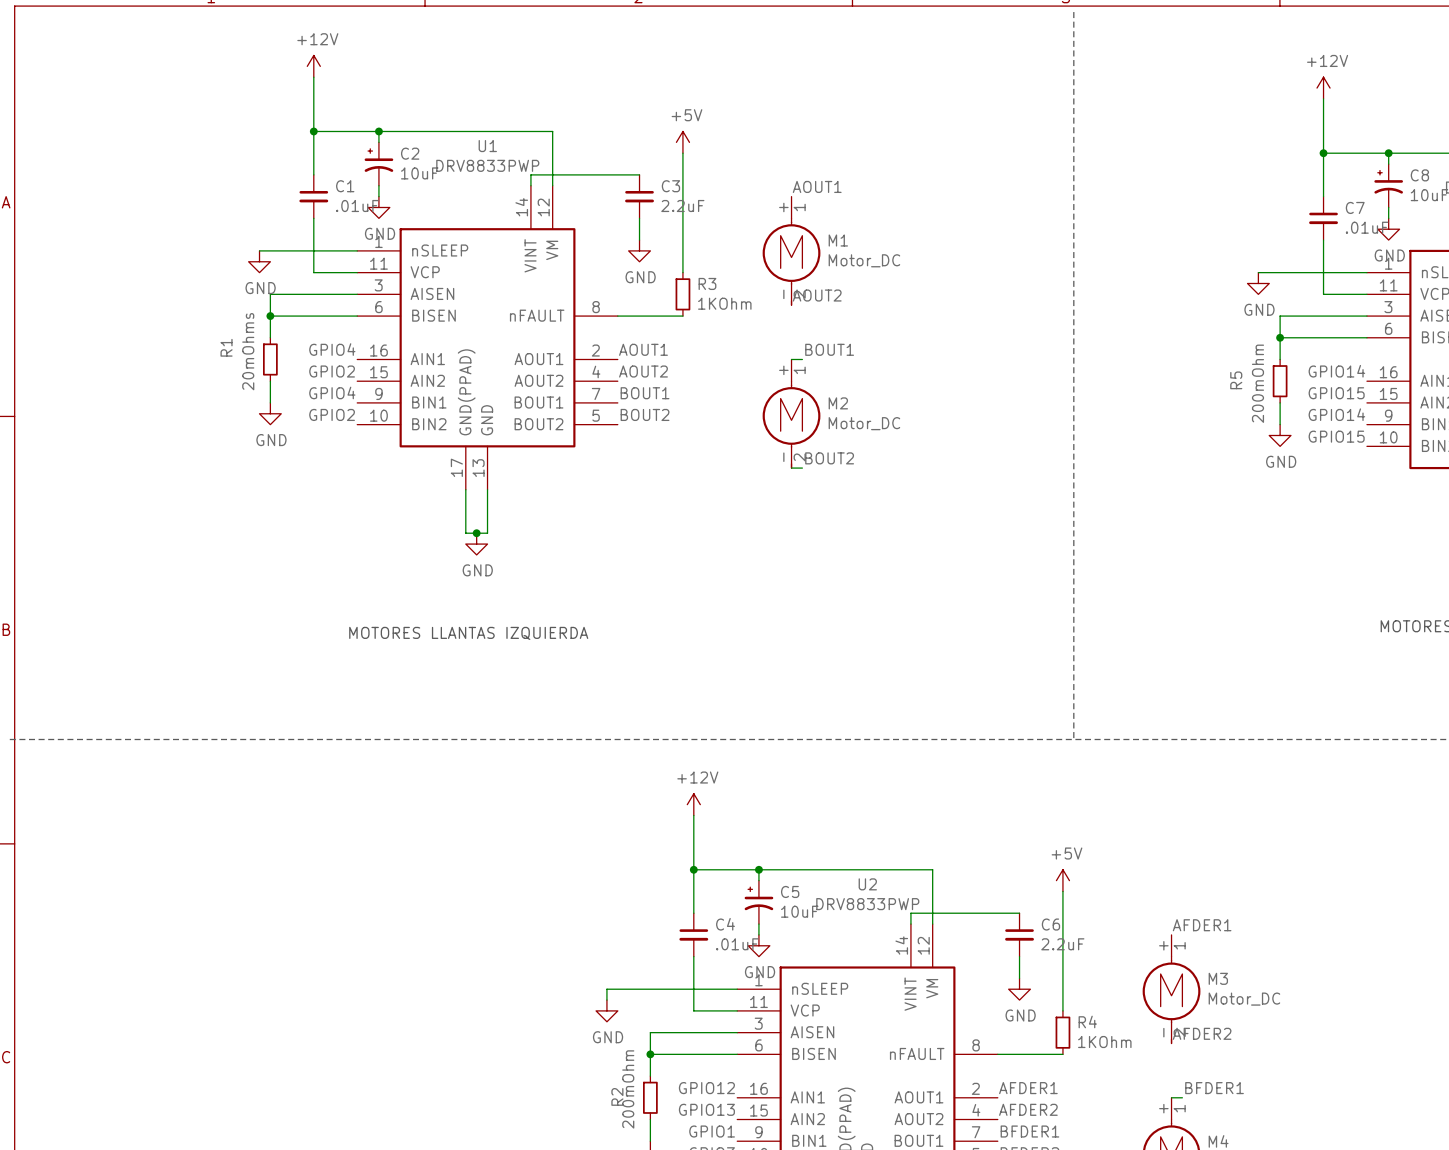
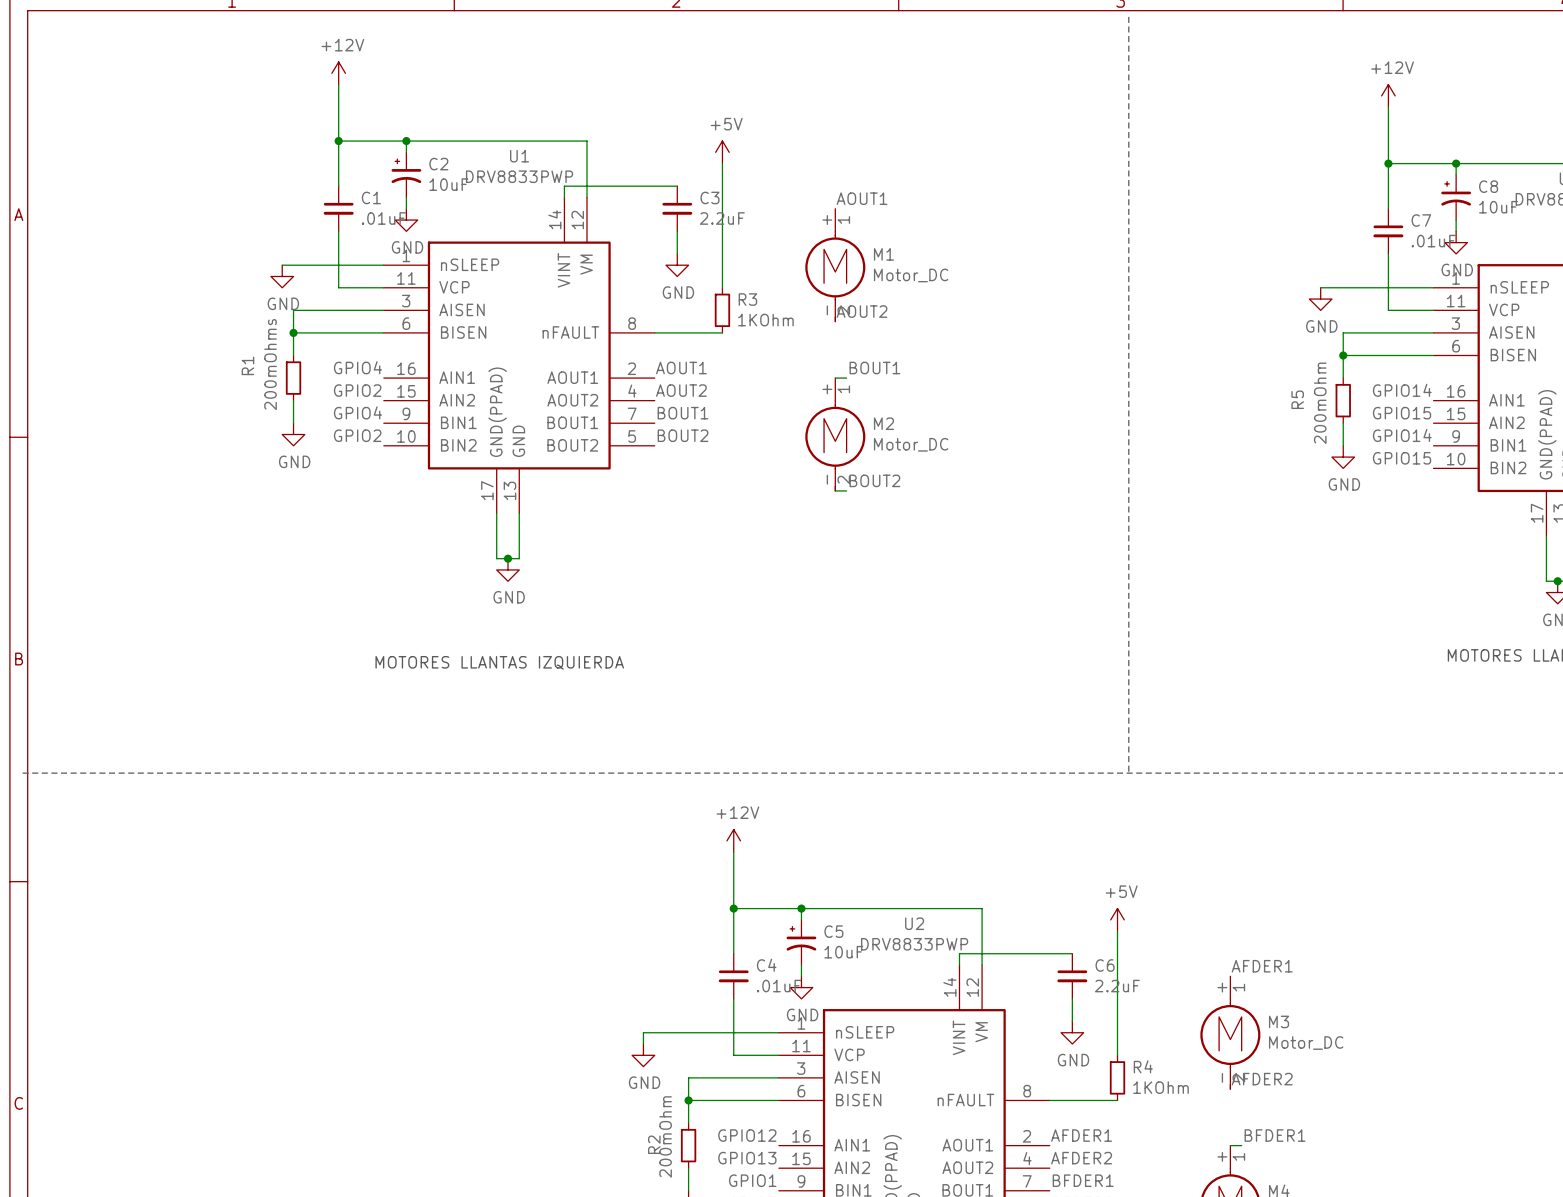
R1 value: 20mOhms (248, 351) -> 200mOhms (270, 364)

